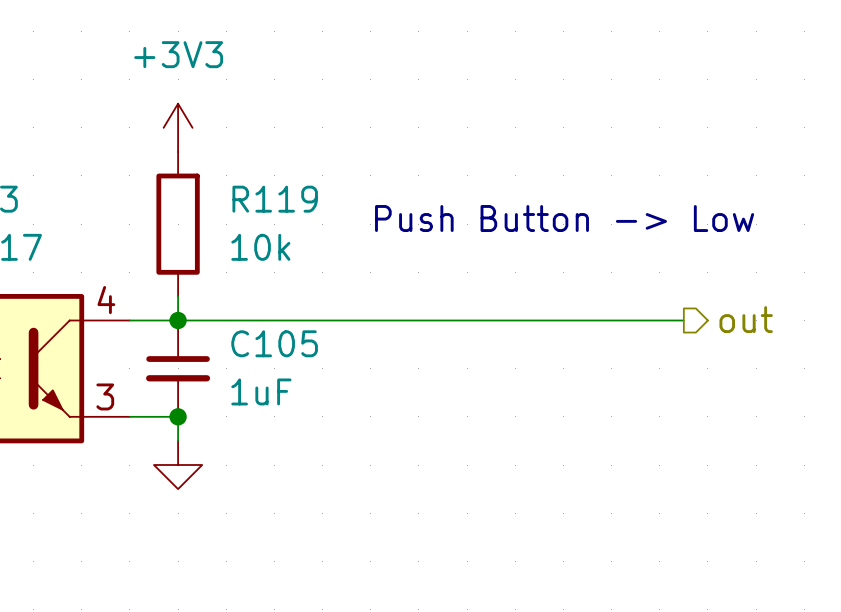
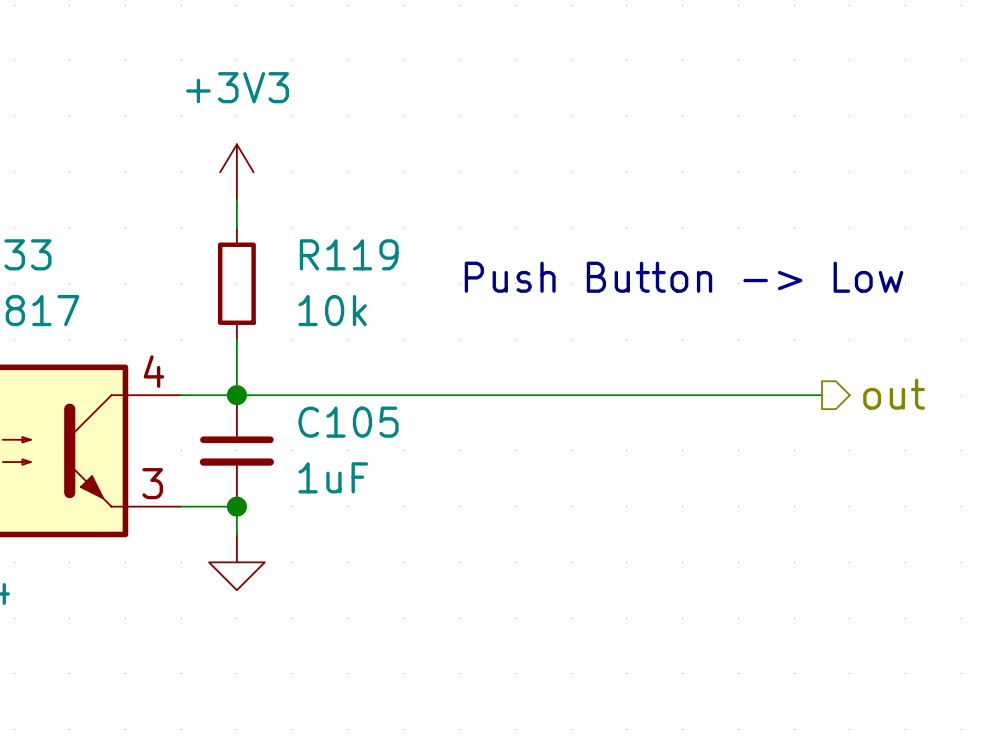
R119 symbol: [156, 151, 200, 297] -> [217, 228, 256, 340]

